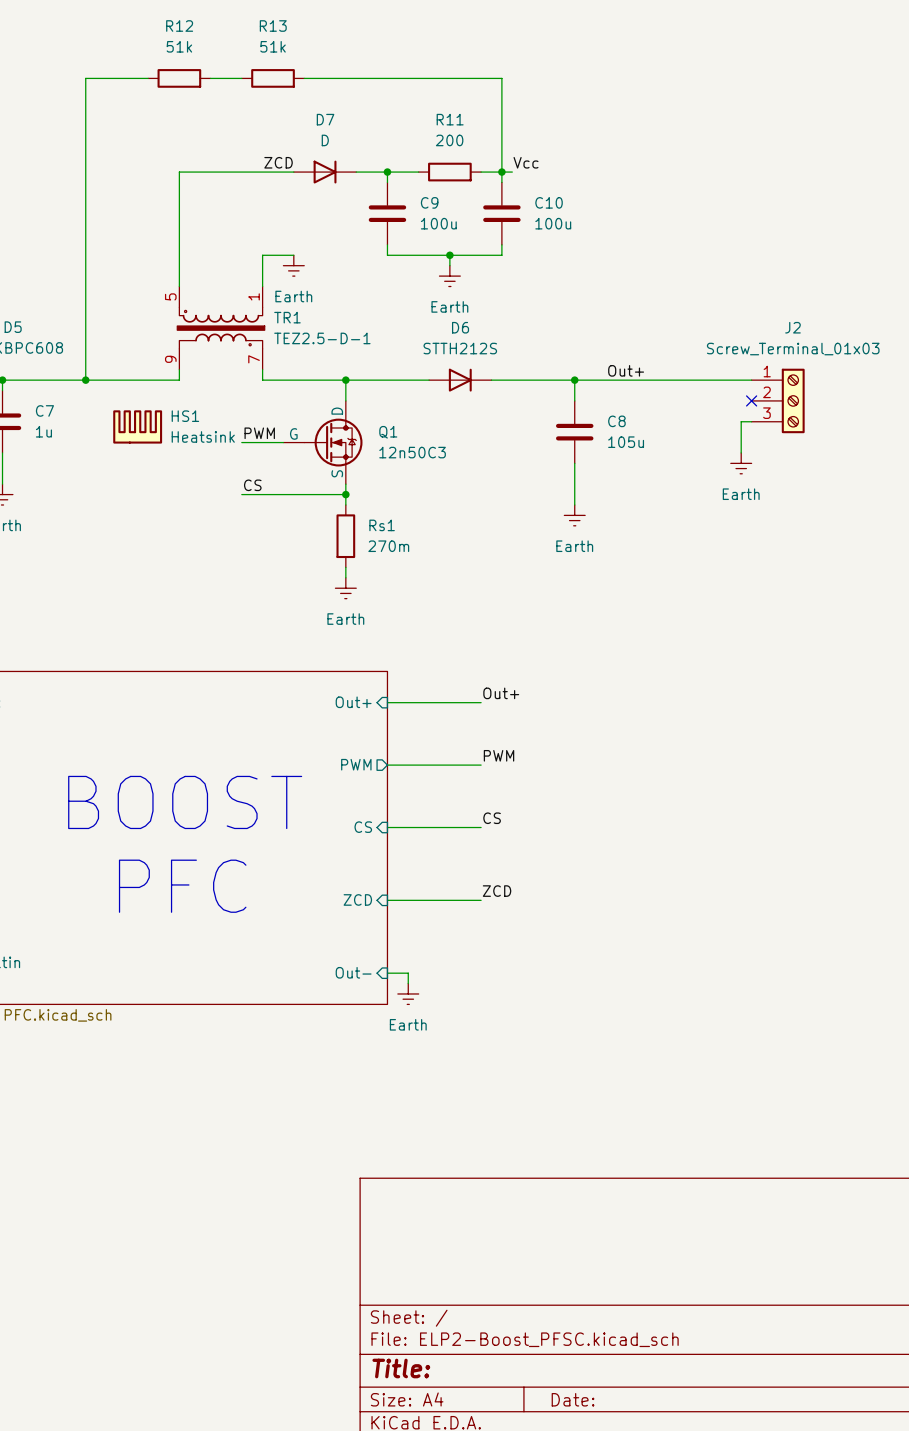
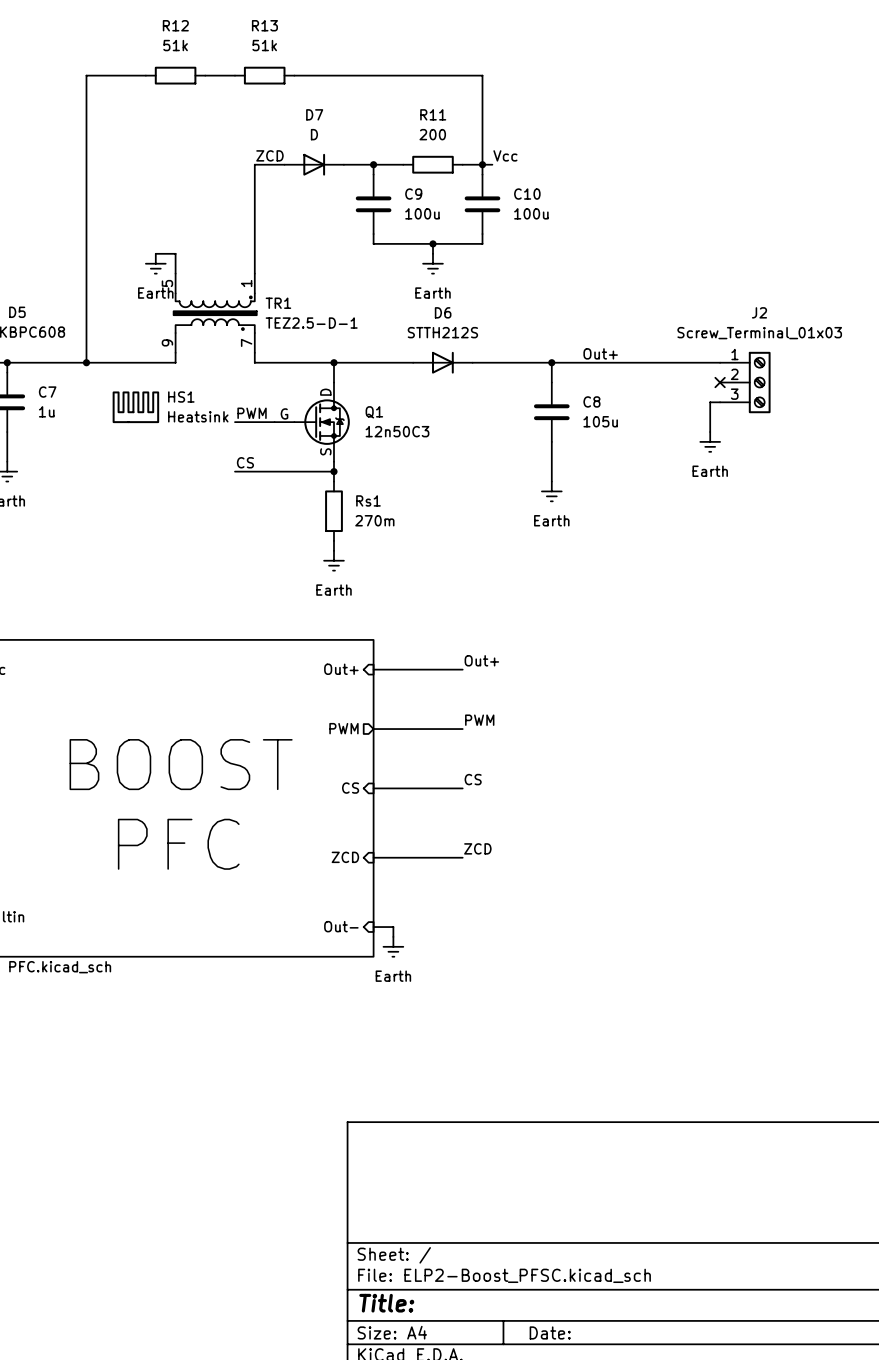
wire: (262, 172) (179, 172) (179, 265) -> (254, 164) (254, 243)
wire: (262, 255) (293, 255) -> none
wire: none -> (155, 253) (175, 253)
power symbol position: Earth (293, 265) -> Earth (155, 263)
TR1 symbol: [177, 286, 265, 370] -> [173, 273, 257, 353]

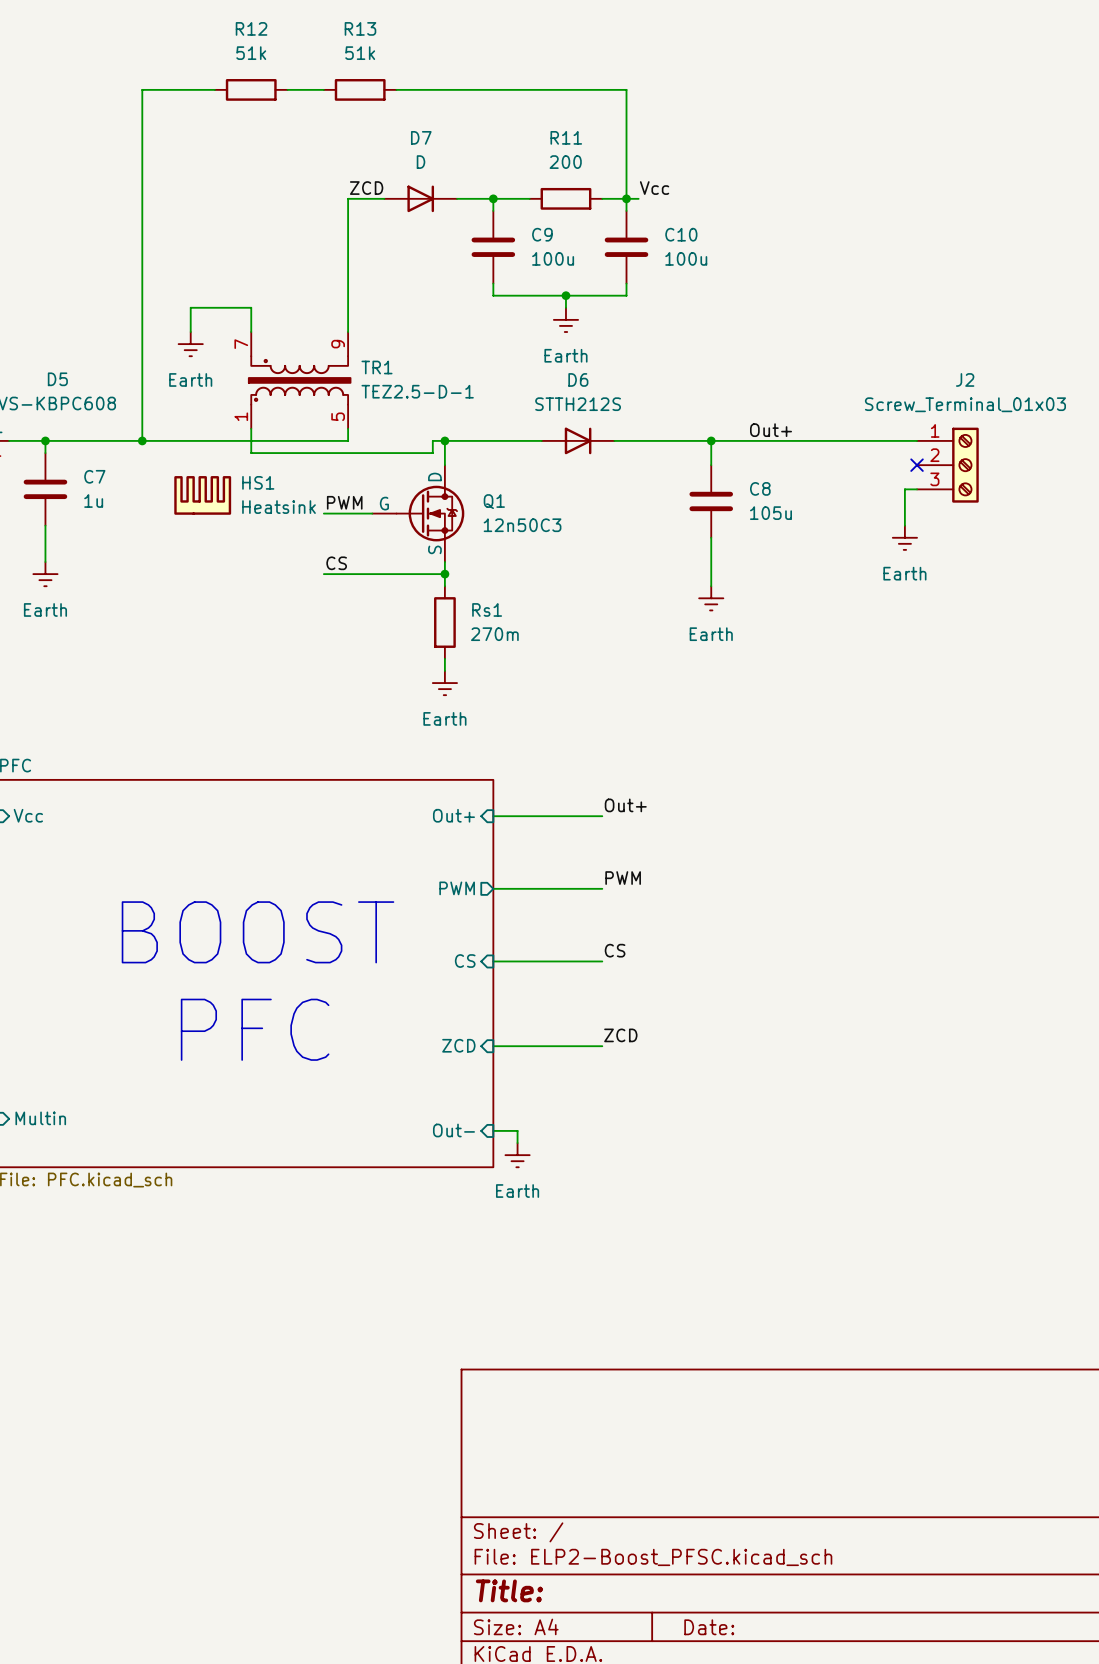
wire: none -> (227, 307) (190, 307) (190, 332)
power symbol position: Earth (155, 263) -> Earth (190, 344)
TR1 rotation: 0° (215, 313) -> 180° (299, 380)
wire: (254, 362) (324, 362) -> (348, 440) (251, 440) (251, 453) (432, 453) (432, 440)

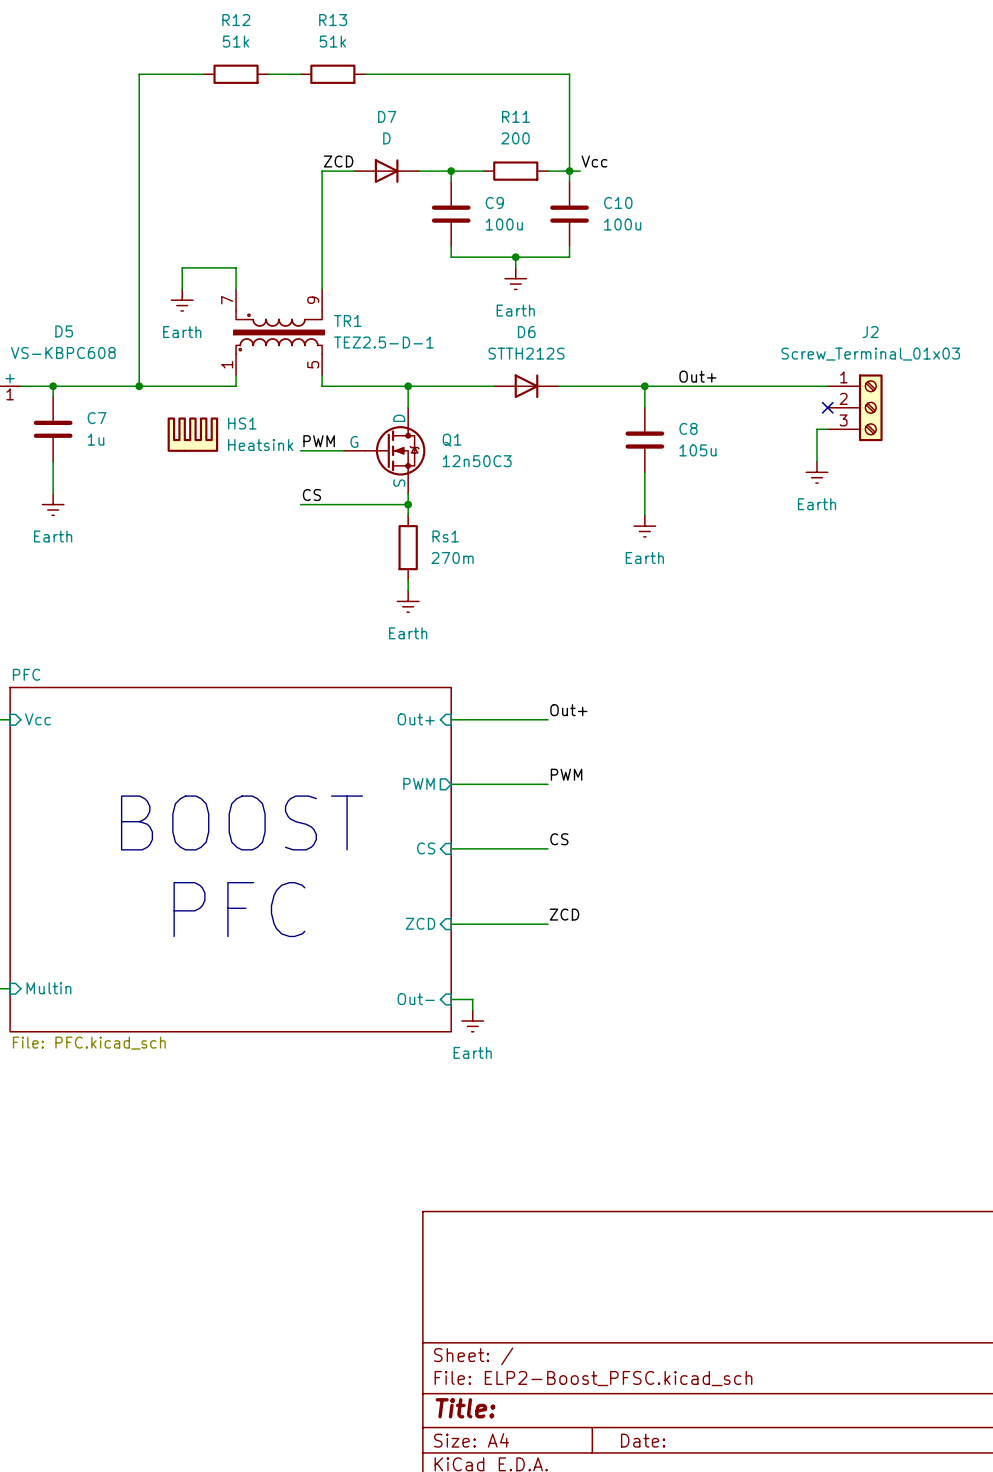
wire: (348, 440) (251, 440) (251, 453) (432, 453) (432, 440) -> (322, 386) (397, 386)

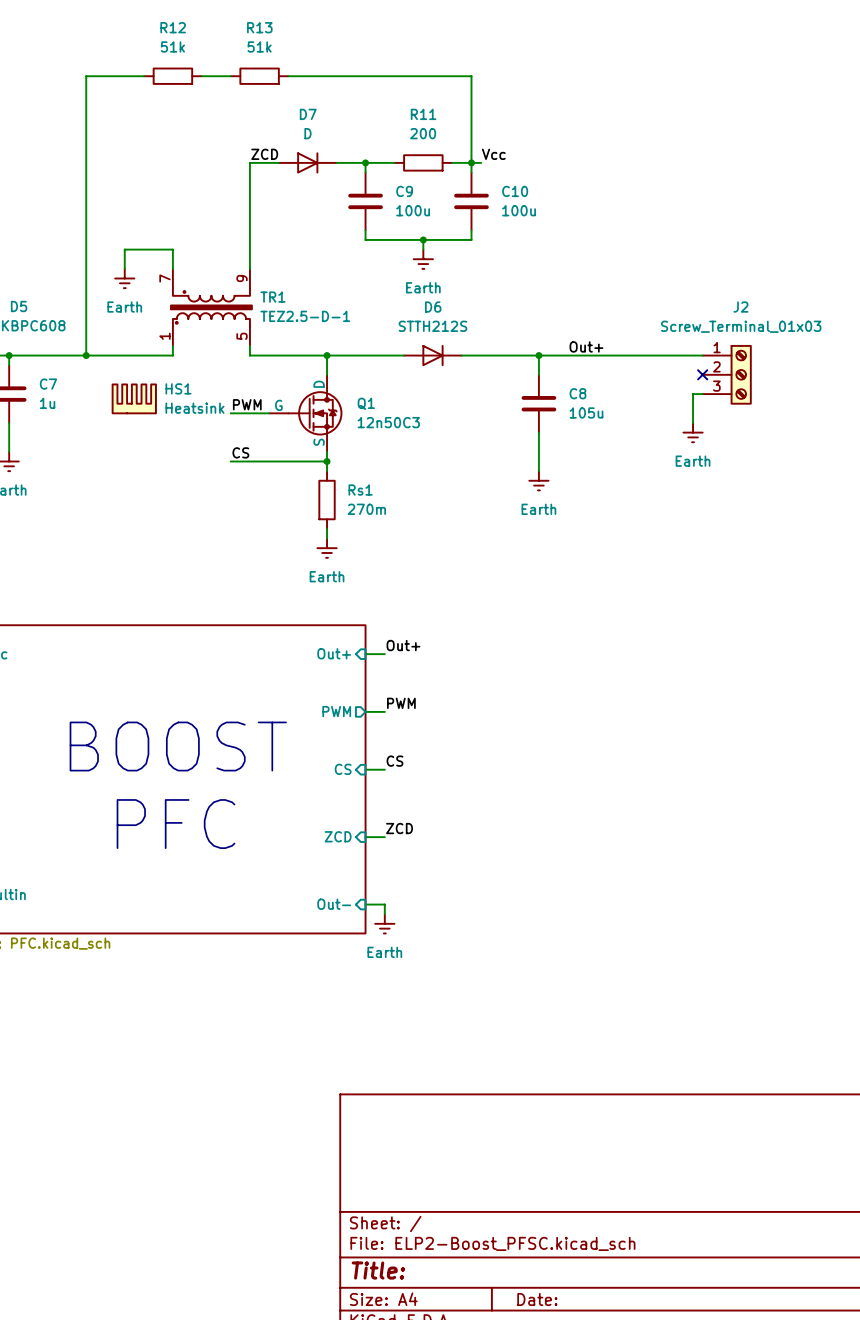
label position: Out+ (568, 710) -> Out+ (403, 645)
wire: (472, 719) (548, 719) -> none
label position: PWM (566, 774) -> PWM (401, 703)
wire: (472, 784) (548, 784) -> none
label position: CS (559, 839) -> CS (394, 761)
wire: (472, 848) (548, 848) -> none
label position: ZCD (564, 914) -> ZCD (399, 828)
wire: (472, 924) (548, 924) -> none

